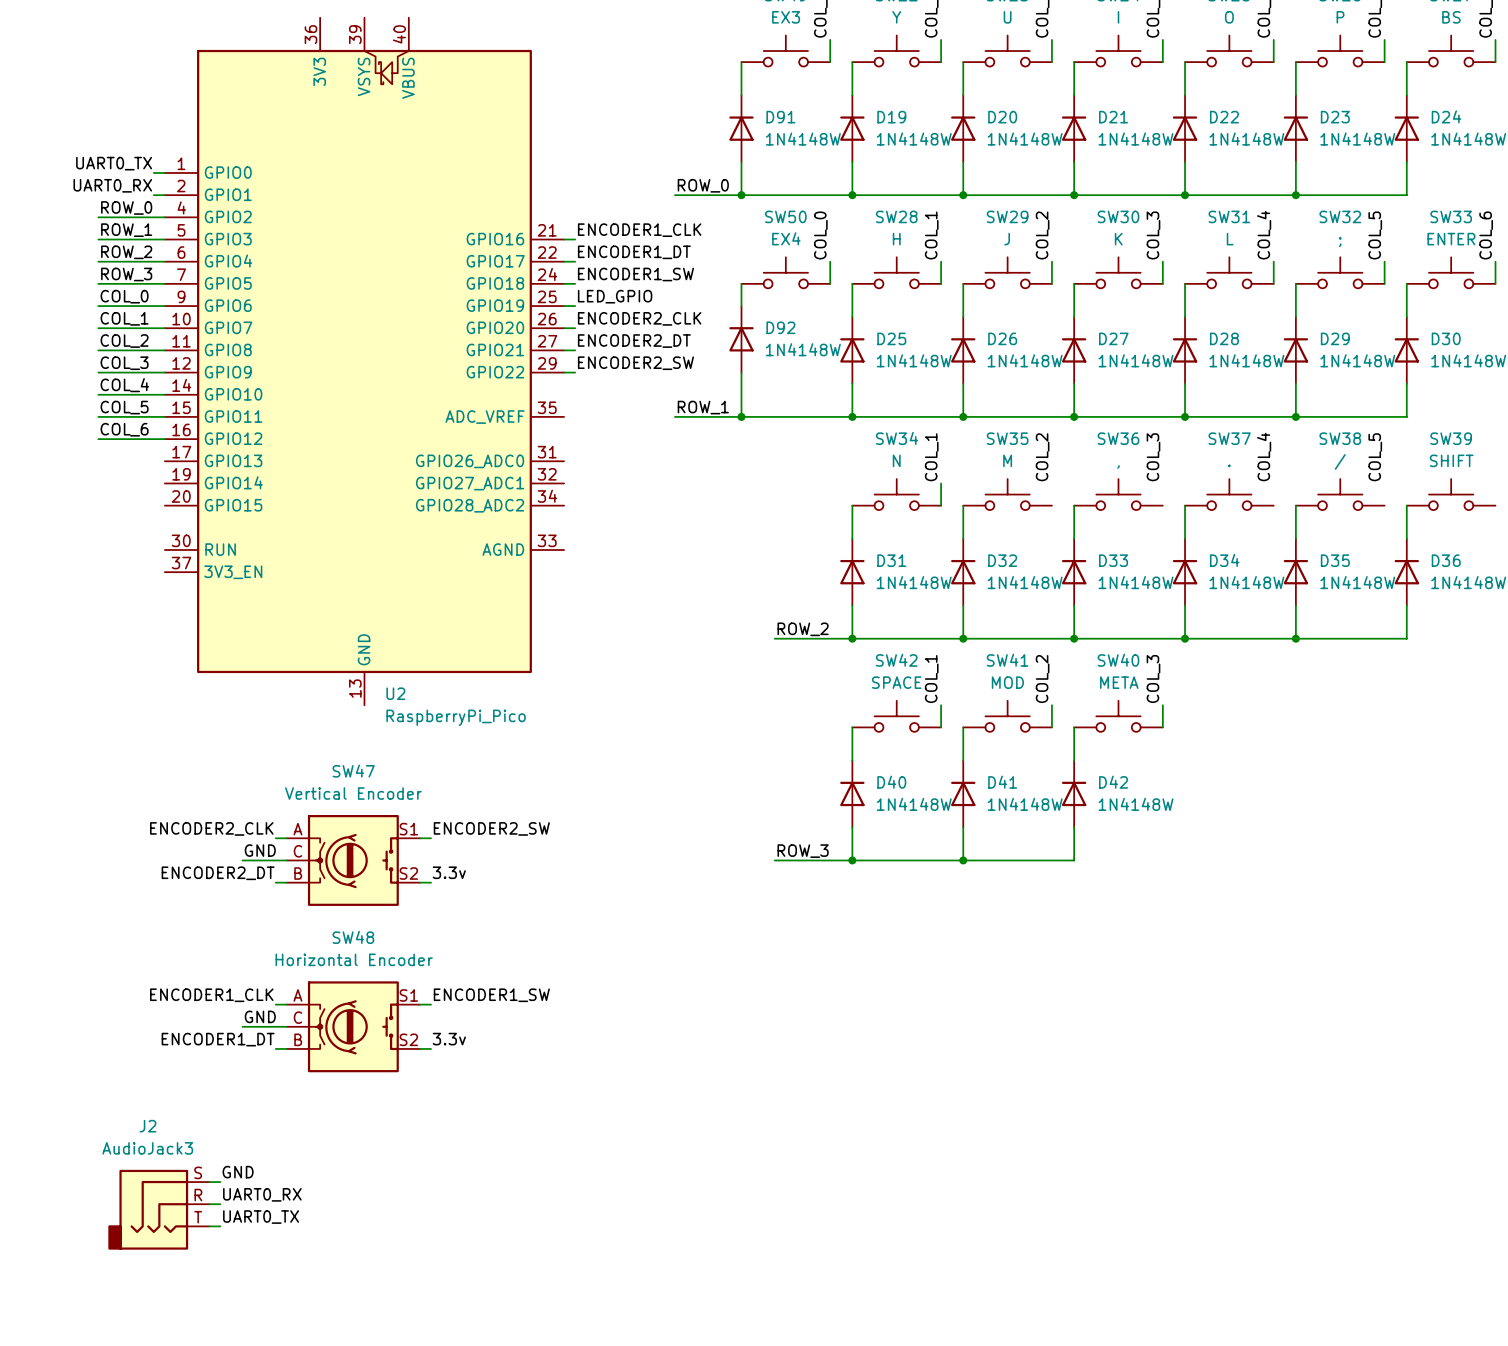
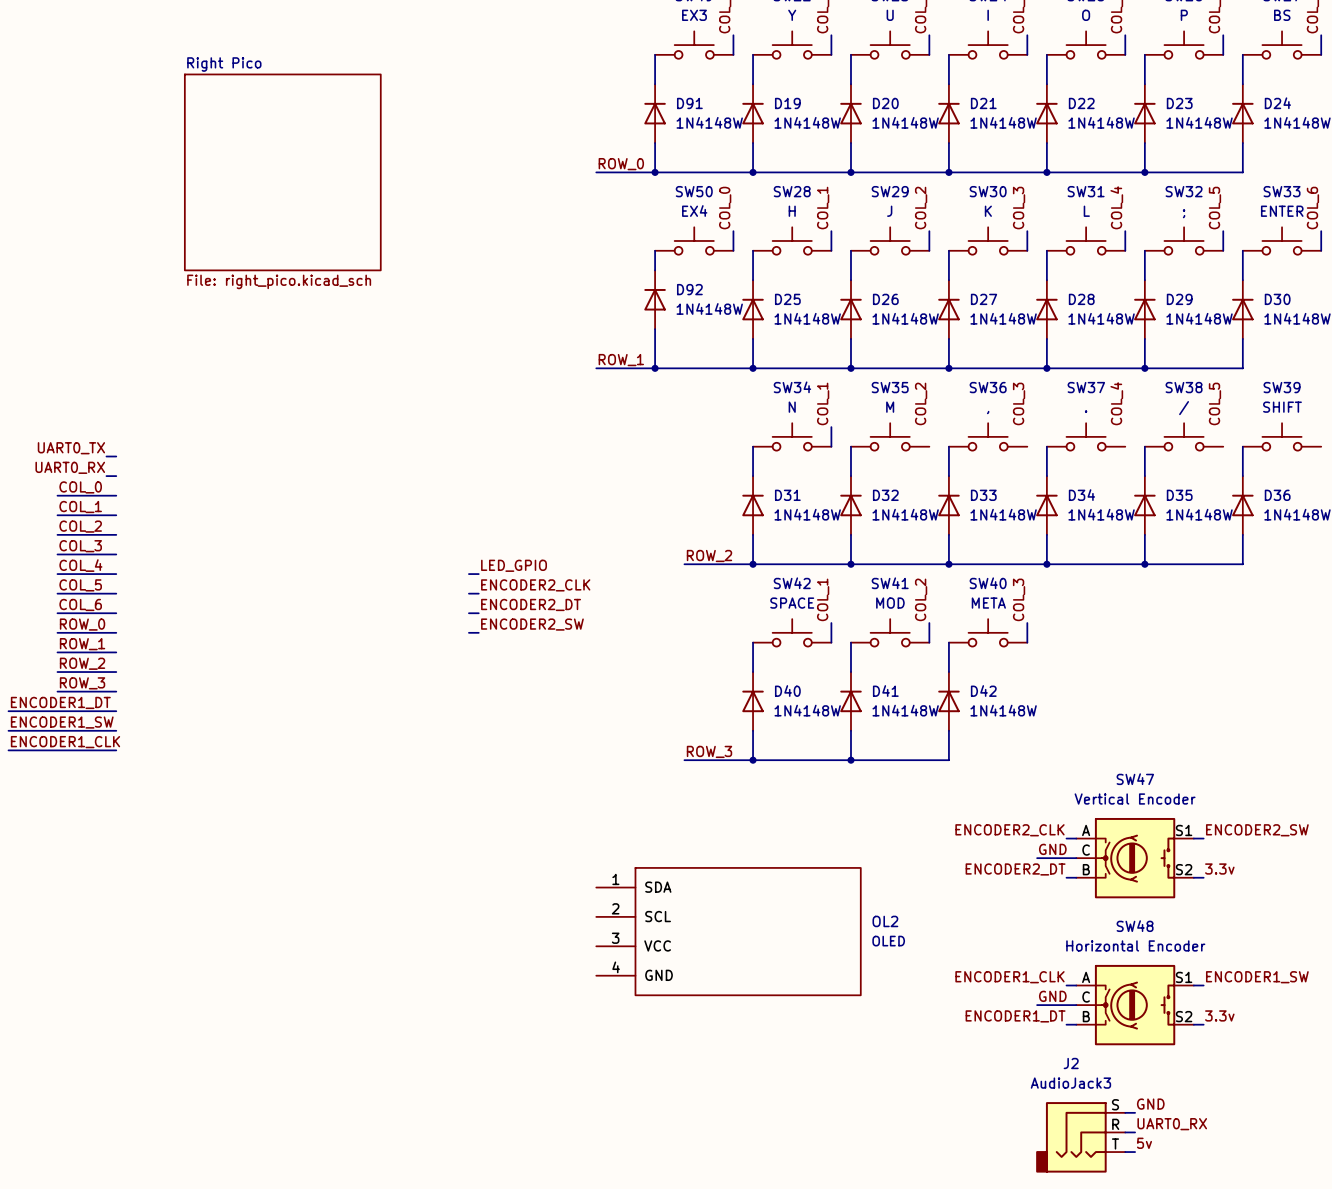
label: UART0_TX (114, 163) -> none
wire: (153, 172) (164, 172) -> none
label: UART0_RX (112, 185) -> none
wire: (153, 195) (164, 195) -> none
sheet Right Pico: none -> File: right_pico.kicad_sch (282, 172)
label: ROW_0 (126, 207) -> none
wire: (98, 217) (164, 217) -> none
label: ROW_1 (126, 230) -> none
label: ENCODER1_CLK (639, 230) -> none
wire: (98, 239) (164, 239) -> none
wire: (564, 239) (575, 239) -> none
label: ROW_2 (126, 252) -> none
label: ENCODER1_DT (634, 252) -> none
wire: (98, 261) (164, 261) -> none
wire: (564, 261) (575, 261) -> none
label: ROW_3 (126, 274) -> none
label: ENCODER1_SW (635, 274) -> none
wire: (98, 283) (164, 283) -> none
wire: (564, 283) (575, 283) -> none
label: COL_0 (124, 296) -> none
label: LED_GPIO (615, 296) -> none
wire: (98, 306) (164, 306) -> none
wire: (564, 306) (575, 306) -> none
label: COL_1 (124, 318) -> none
label: ENCODER2_CLK (639, 318) -> none
wire: (98, 328) (164, 328) -> none
wire: (564, 328) (575, 328) -> none
label: COL_2 (124, 341) -> none
label: ENCODER2_DT (634, 341) -> none
wire: (98, 350) (164, 350) -> (57, 495) (116, 495)
wire: (564, 350) (575, 350) -> none
U2: RaspberryPi_Pico (364, 361) -> none
label: COL_3 (124, 363) -> none
label: ENCODER2_SW (635, 363) -> none
wire: (98, 372) (164, 372) -> (57, 515) (116, 515)
wire: (564, 372) (575, 372) -> none
label: COL_4 (124, 385) -> none
wire: (98, 394) (164, 394) -> (57, 534) (116, 534)
label: COL_5 (124, 407) -> none
wire: (98, 416) (164, 416) -> (57, 554) (116, 554)
label: COL_6 (124, 429) -> none
wire: (98, 439) (164, 439) -> (57, 574) (116, 574)
label: none -> UART0_TX (71, 448)
wire: none -> (106, 456) (116, 456)
label: none -> UART0_RX (70, 467)
wire: none -> (106, 476) (116, 476)
label: none -> COL_0 (80, 487)
label: none -> COL_1 (80, 507)
label: none -> COL_2 (80, 526)
label: none -> COL_3 (80, 546)
label: none -> COL_4 (80, 565)
label: none -> LED_GPIO (514, 565)
wire: none -> (468, 574) (478, 574)
label: none -> COL_5 (80, 585)
label: none -> ENCODER2_CLK (535, 585)
wire: none -> (57, 593) (116, 593)
label: none -> COL_6 (80, 604)
label: none -> ENCODER2_DT (531, 604)
wire: none -> (57, 613) (116, 613)
wire: none -> (468, 613) (478, 613)
label: none -> ROW_0 (82, 624)
wire: none -> (57, 632) (116, 632)
label: none -> ROW_1 (82, 644)
wire: none -> (57, 652) (116, 652)
label: none -> ROW_2 (82, 663)
wire: none -> (57, 672) (116, 672)
label: none -> ROW_3 (82, 683)
wire: none -> (57, 691) (116, 691)
label: none -> ENCODER1_DT (60, 702)
wire: none -> (8, 711) (116, 711)
label: none -> ENCODER1_SW (62, 722)
wire: none -> (8, 730) (116, 730)
label: ENCODER2_CLK (211, 828) -> none
label position: ENCODER2_SW (491, 828) -> ENCODER2_SW (532, 624)
wire: (275, 838) (286, 838) -> none
wire: (419, 838) (431, 838) -> (468, 593) (478, 593)
label: none -> ENCODER1_CLK (65, 742)
wire: none -> (8, 750) (116, 750)
label: GND (260, 850) -> none
wire: (242, 860) (286, 860) -> none
SW47 position: (353, 860) -> (1135, 858)
label: 3.3v (449, 872) -> none
label: ENCODER2_DT (218, 873) -> none
wire: (275, 882) (286, 882) -> none
wire: (419, 882) (431, 882) -> (468, 632) (478, 632)
label: none -> ENCODER2_CLK (1009, 830)
label: none -> ENCODER2_SW (1257, 830)
wire: none -> (1066, 838) (1076, 838)
wire: none -> (1193, 838) (1203, 838)
label: none -> GND (1052, 849)
wire: none -> (1037, 858) (1076, 858)
label: none -> 3.3v (1219, 869)
label: none -> ENCODER2_DT (1015, 869)
wire: none -> (1066, 877) (1076, 877)
wire: none -> (1193, 877) (1203, 877)
label: ENCODER1_CLK (211, 995) -> none
label: ENCODER1_SW (491, 995) -> none
wire: (275, 1004) (286, 1004) -> none
wire: (419, 1004) (431, 1004) -> none
label: GND (260, 1016) -> none
wire: (242, 1026) (286, 1026) -> none
SW48 position: (353, 1026) -> (1135, 1005)
label: ENCODER1_DT (218, 1039) -> none
label: 3.3v (449, 1039) -> none
wire: (275, 1048) (286, 1048) -> none
wire: (419, 1048) (431, 1048) -> none
OL2: none -> OLED (728, 931)
label: none -> ENCODER1_CLK (1009, 977)
label: none -> ENCODER1_SW (1257, 977)
wire: none -> (1066, 985) (1076, 985)
wire: none -> (1193, 985) (1203, 985)
label: none -> GND (1052, 996)
wire: none -> (1037, 1005) (1076, 1005)
label: none -> 3.3v (1219, 1015)
label: none -> ENCODER1_DT (1015, 1016)
wire: none -> (1066, 1024) (1076, 1024)
wire: none -> (1193, 1024) (1203, 1024)
label: GND (238, 1172) -> none
wire: (209, 1182) (220, 1182) -> none
label: UART0_RX (262, 1194) -> none
wire: (209, 1204) (220, 1204) -> none
J2 position: (158, 1209) -> (1080, 1137)
label: UART0_TX (261, 1217) -> none
wire: (209, 1226) (220, 1226) -> none
label: none -> GND (1150, 1104)
wire: none -> (1125, 1112) (1135, 1112)
label: none -> UART0_RX (1172, 1124)
wire: none -> (1125, 1132) (1135, 1132)
label: none -> 5v (1144, 1143)
wire: none -> (1125, 1152) (1135, 1152)

